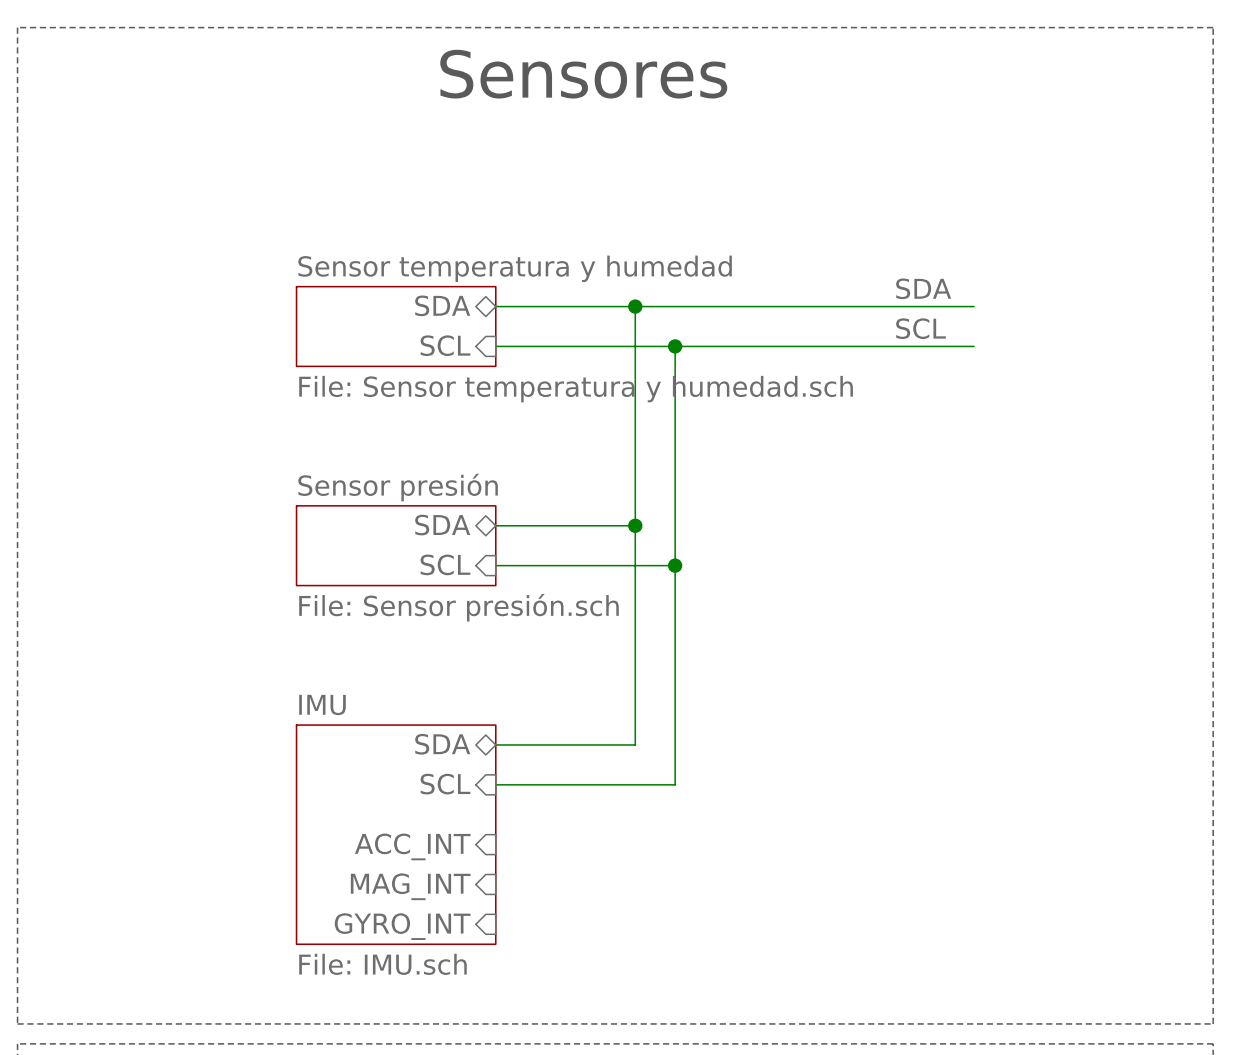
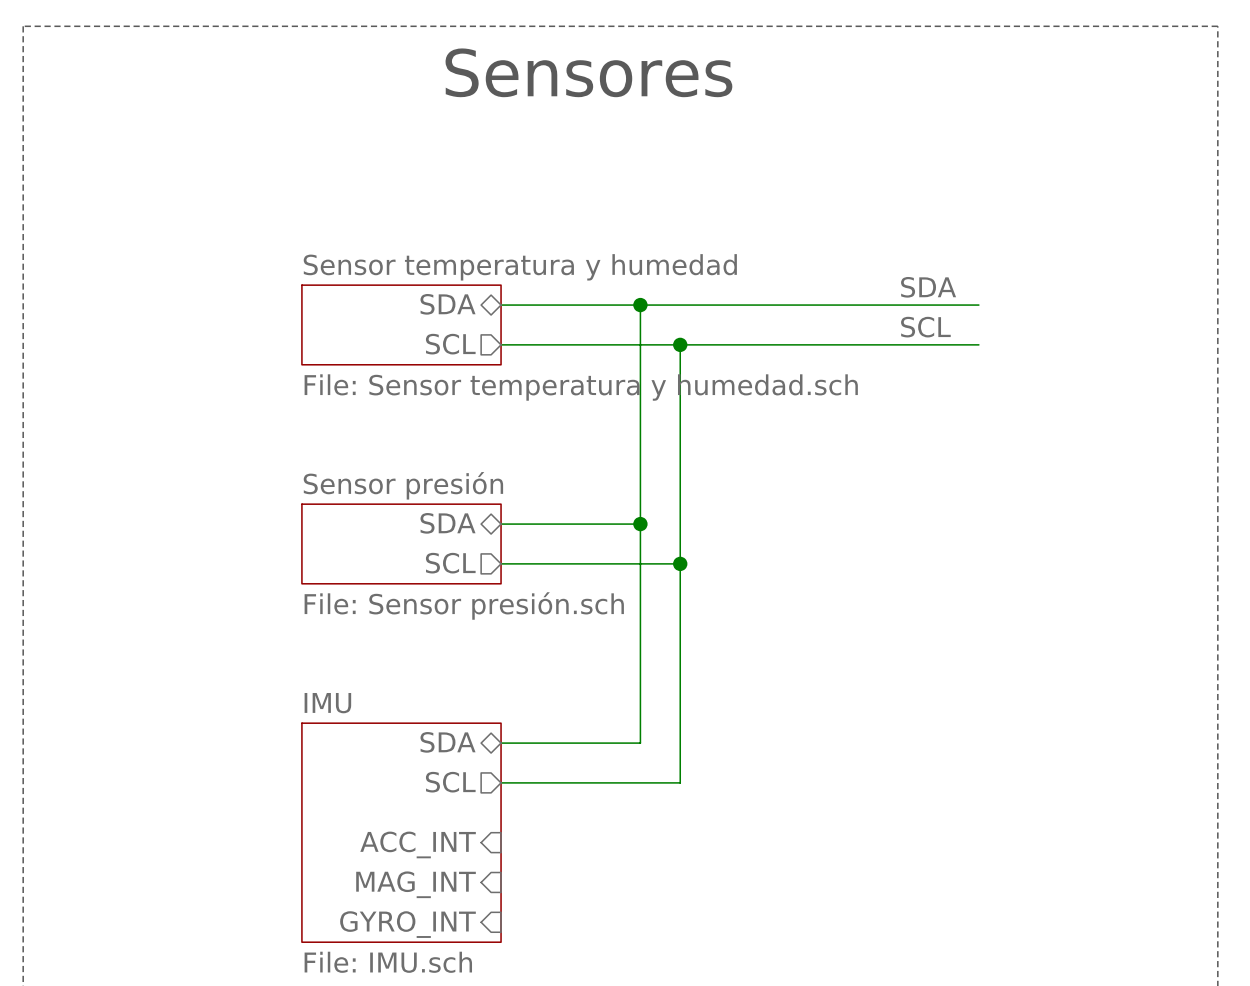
sheet pin: SCL (445, 345) -> none
hierarchical label: none -> SCL (450, 344)
sheet pin: SCL (445, 564) -> none
hierarchical label: none -> SCL (450, 563)
sheet pin: SCL (445, 784) -> none
hierarchical label: none -> SCL (450, 782)

